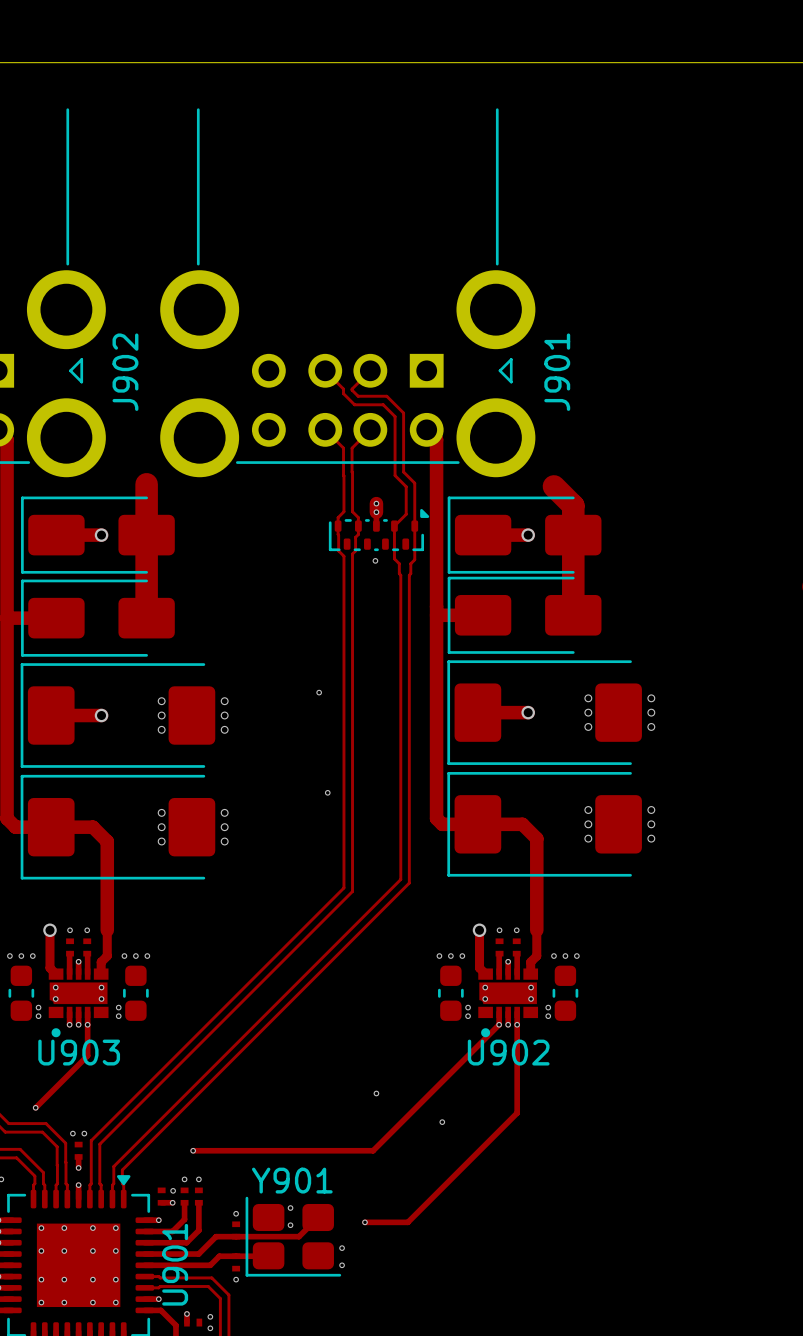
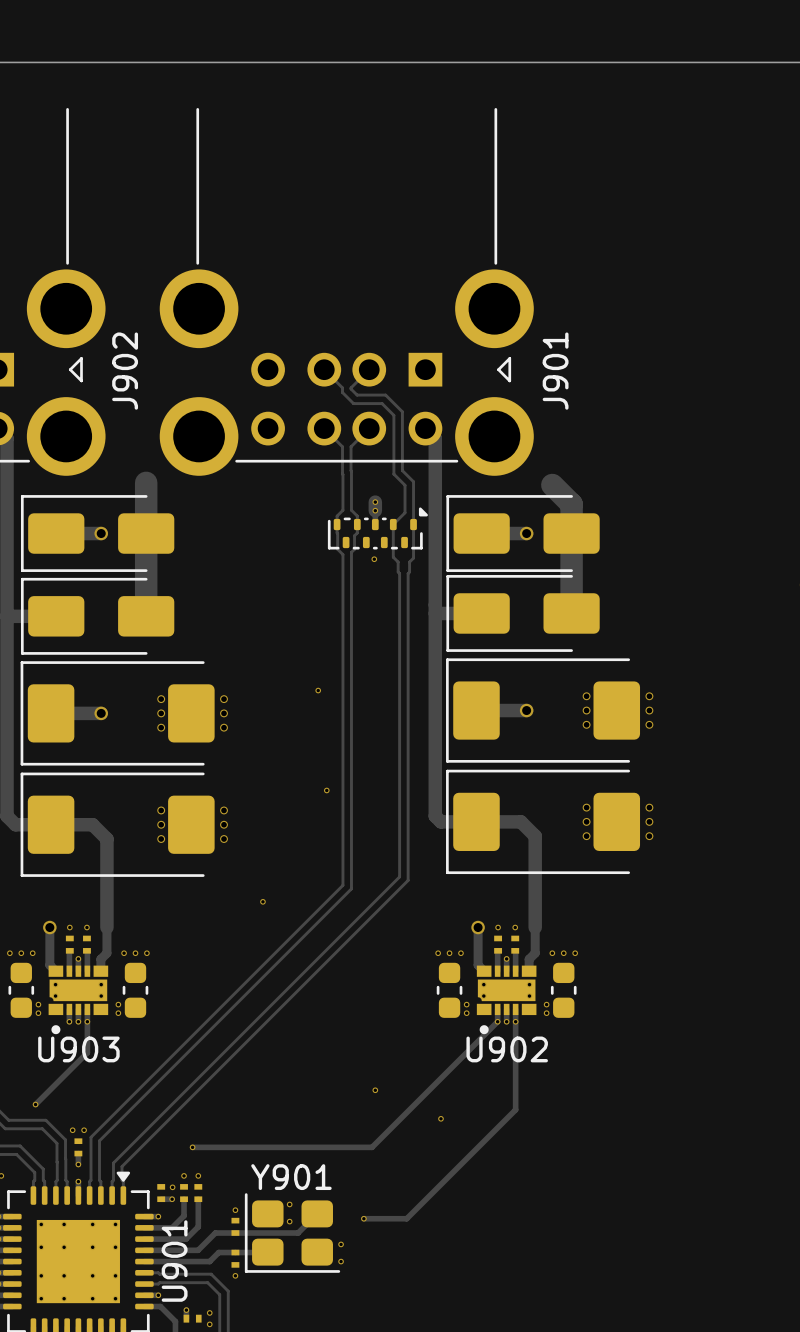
via: none -> (262, 901)

